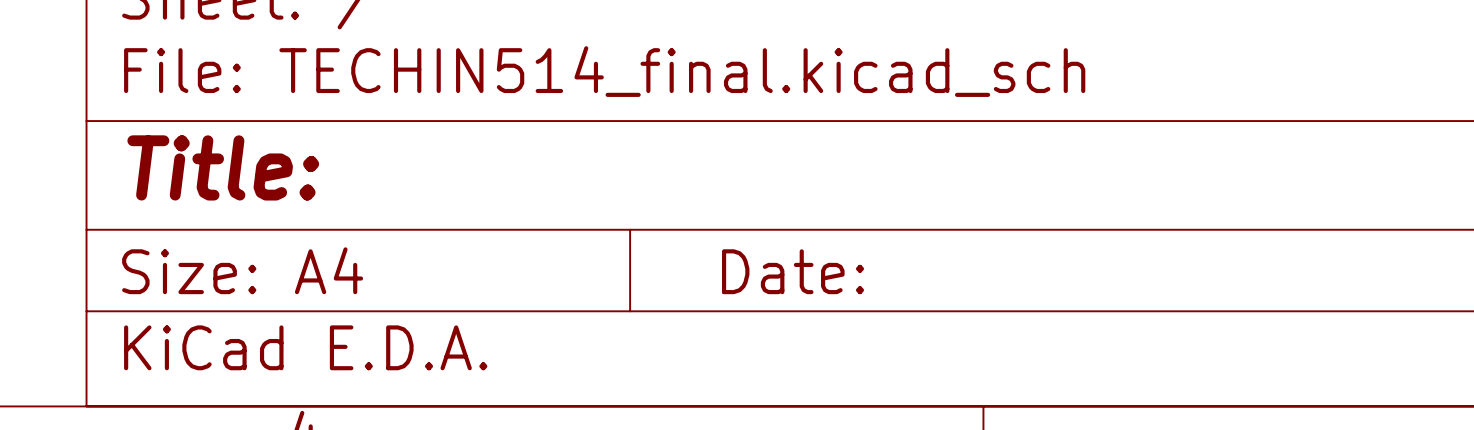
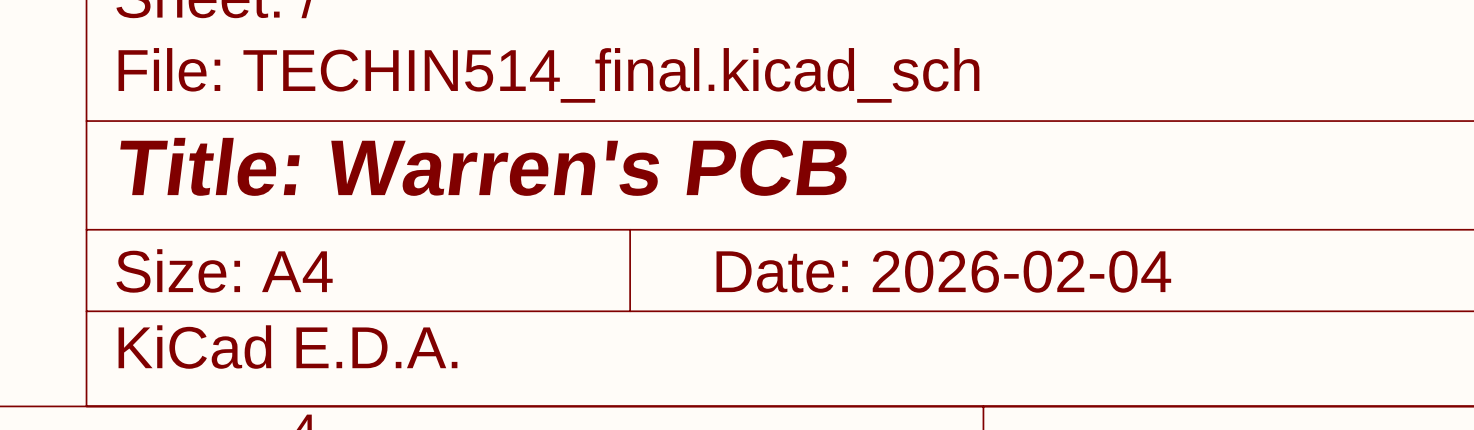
title block: Title: (223, 167) -> Title: Warren's PCB (483, 166)
title block: Date: (793, 271) -> Date: 2026-02-04 (943, 271)

